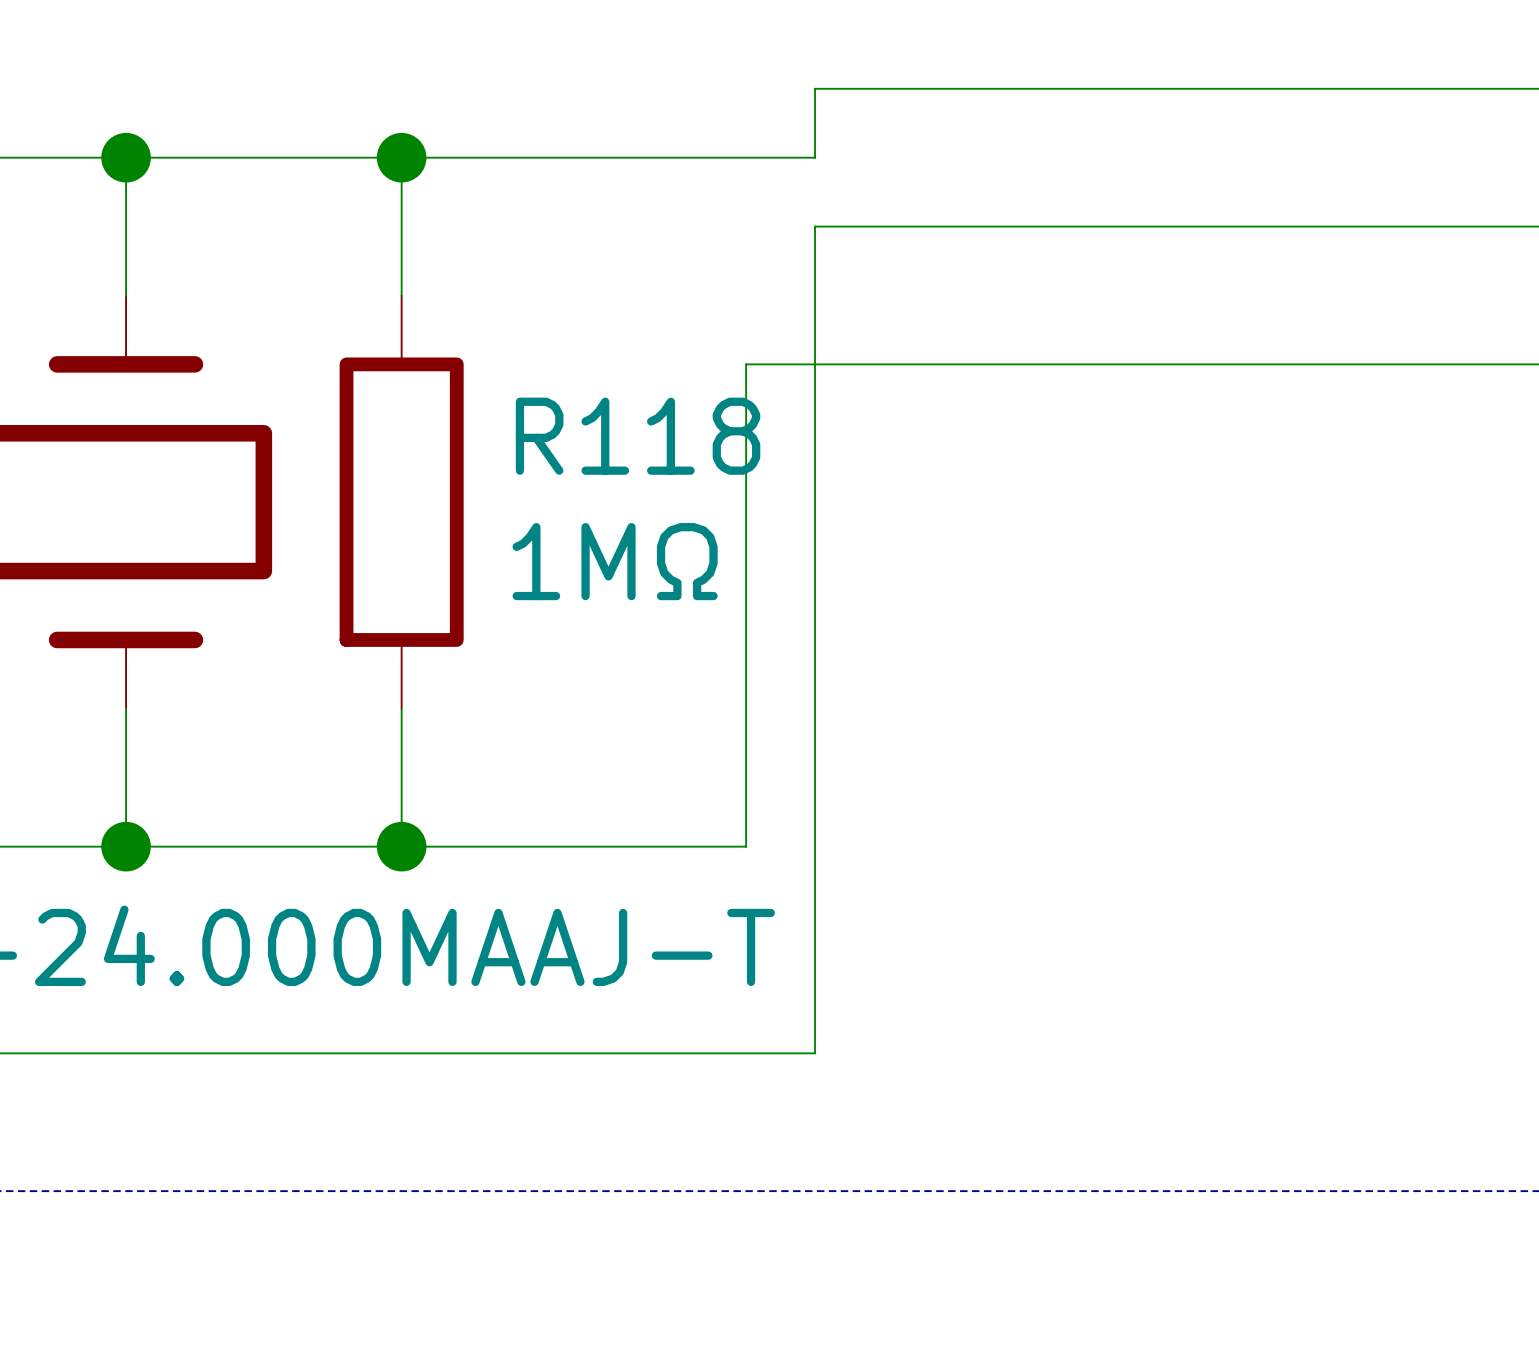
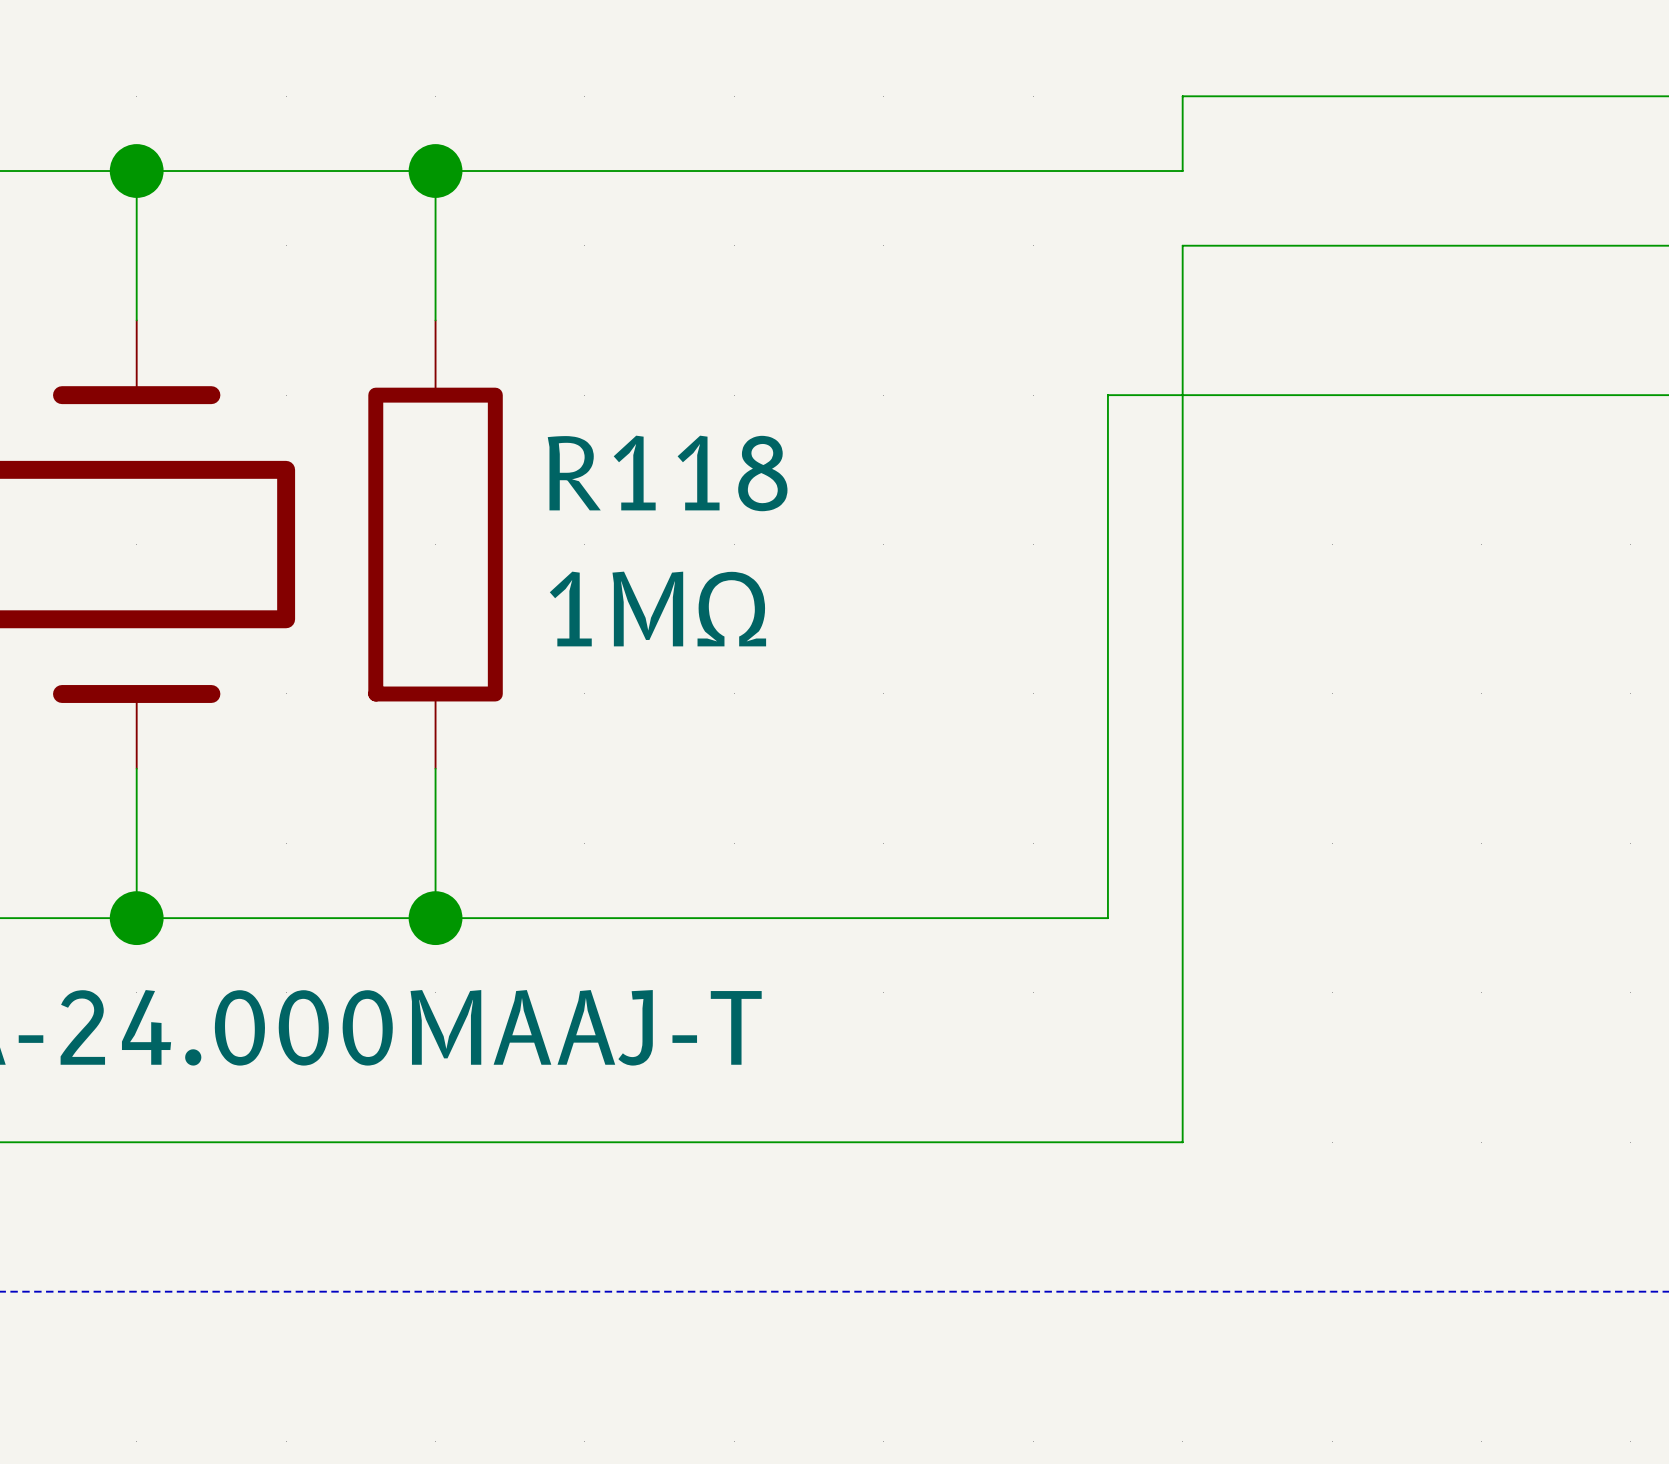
wire: (1090, 88) (815, 88) (815, 157) -> (1182, 96) (1182, 171) (883, 171)
wire: (1090, 226) (815, 226) (815, 1053) -> (1182, 245) (1182, 1142) (883, 1142)
wire: (1021, 364) (746, 364) (746, 846) -> (1107, 395) (1107, 918) (809, 918)

